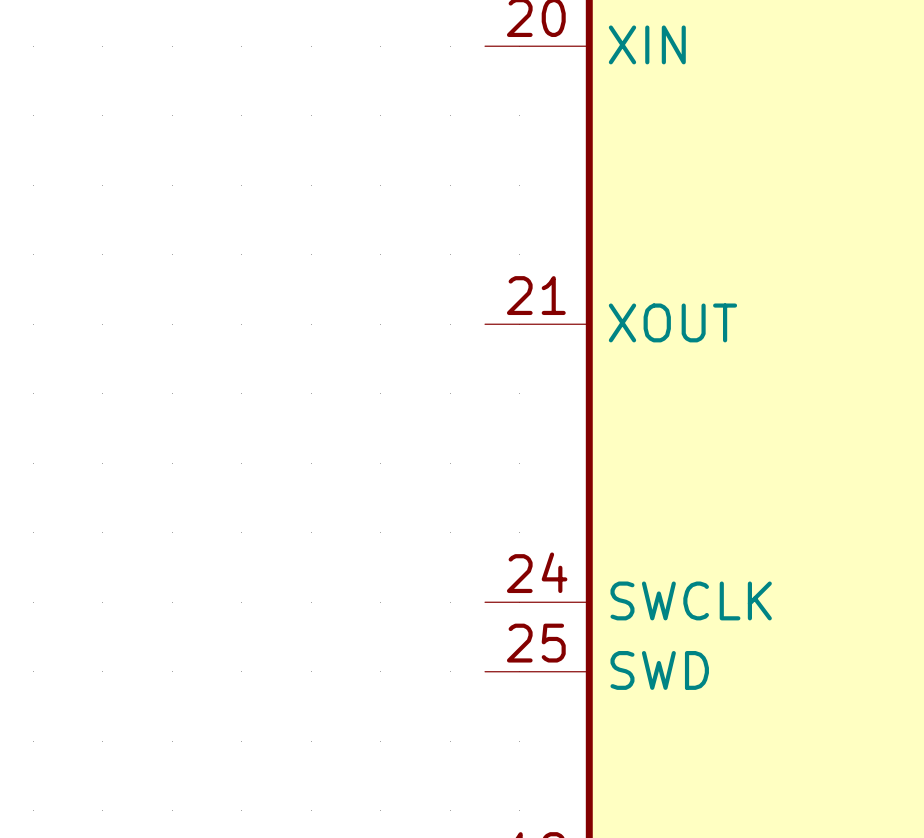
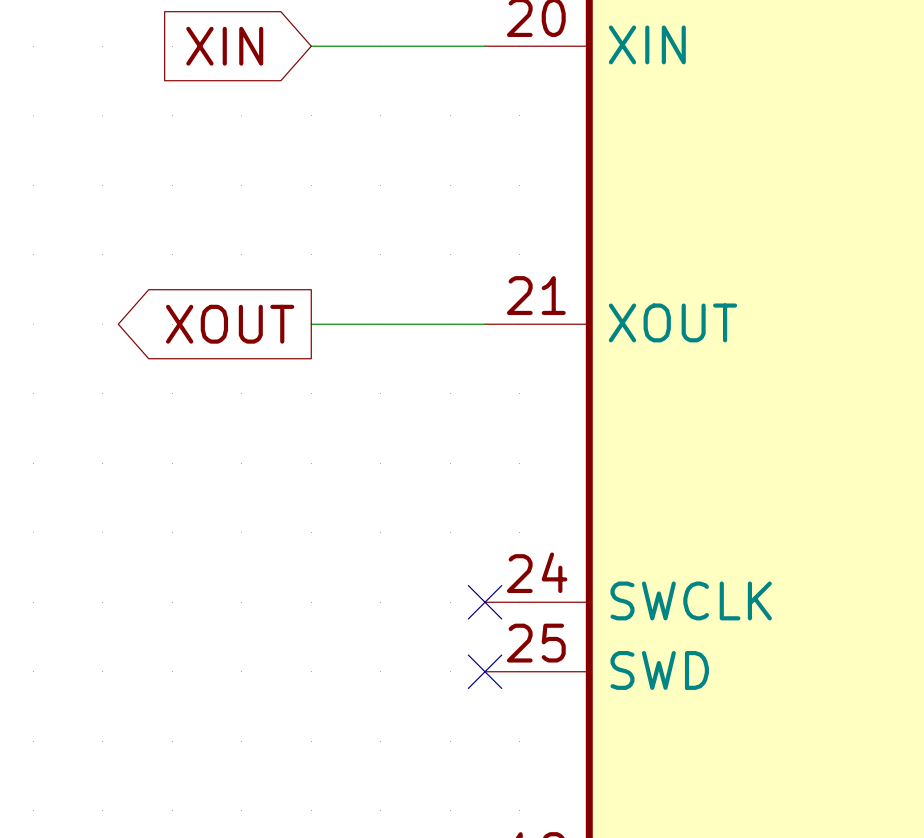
global label: none -> XIN (224, 46)
wire: none -> (311, 46) (485, 46)
global label: none -> XOUT (230, 324)
wire: none -> (311, 324) (485, 324)
no-connect mark: none -> (485, 602)
no-connect mark: none -> (485, 671)

